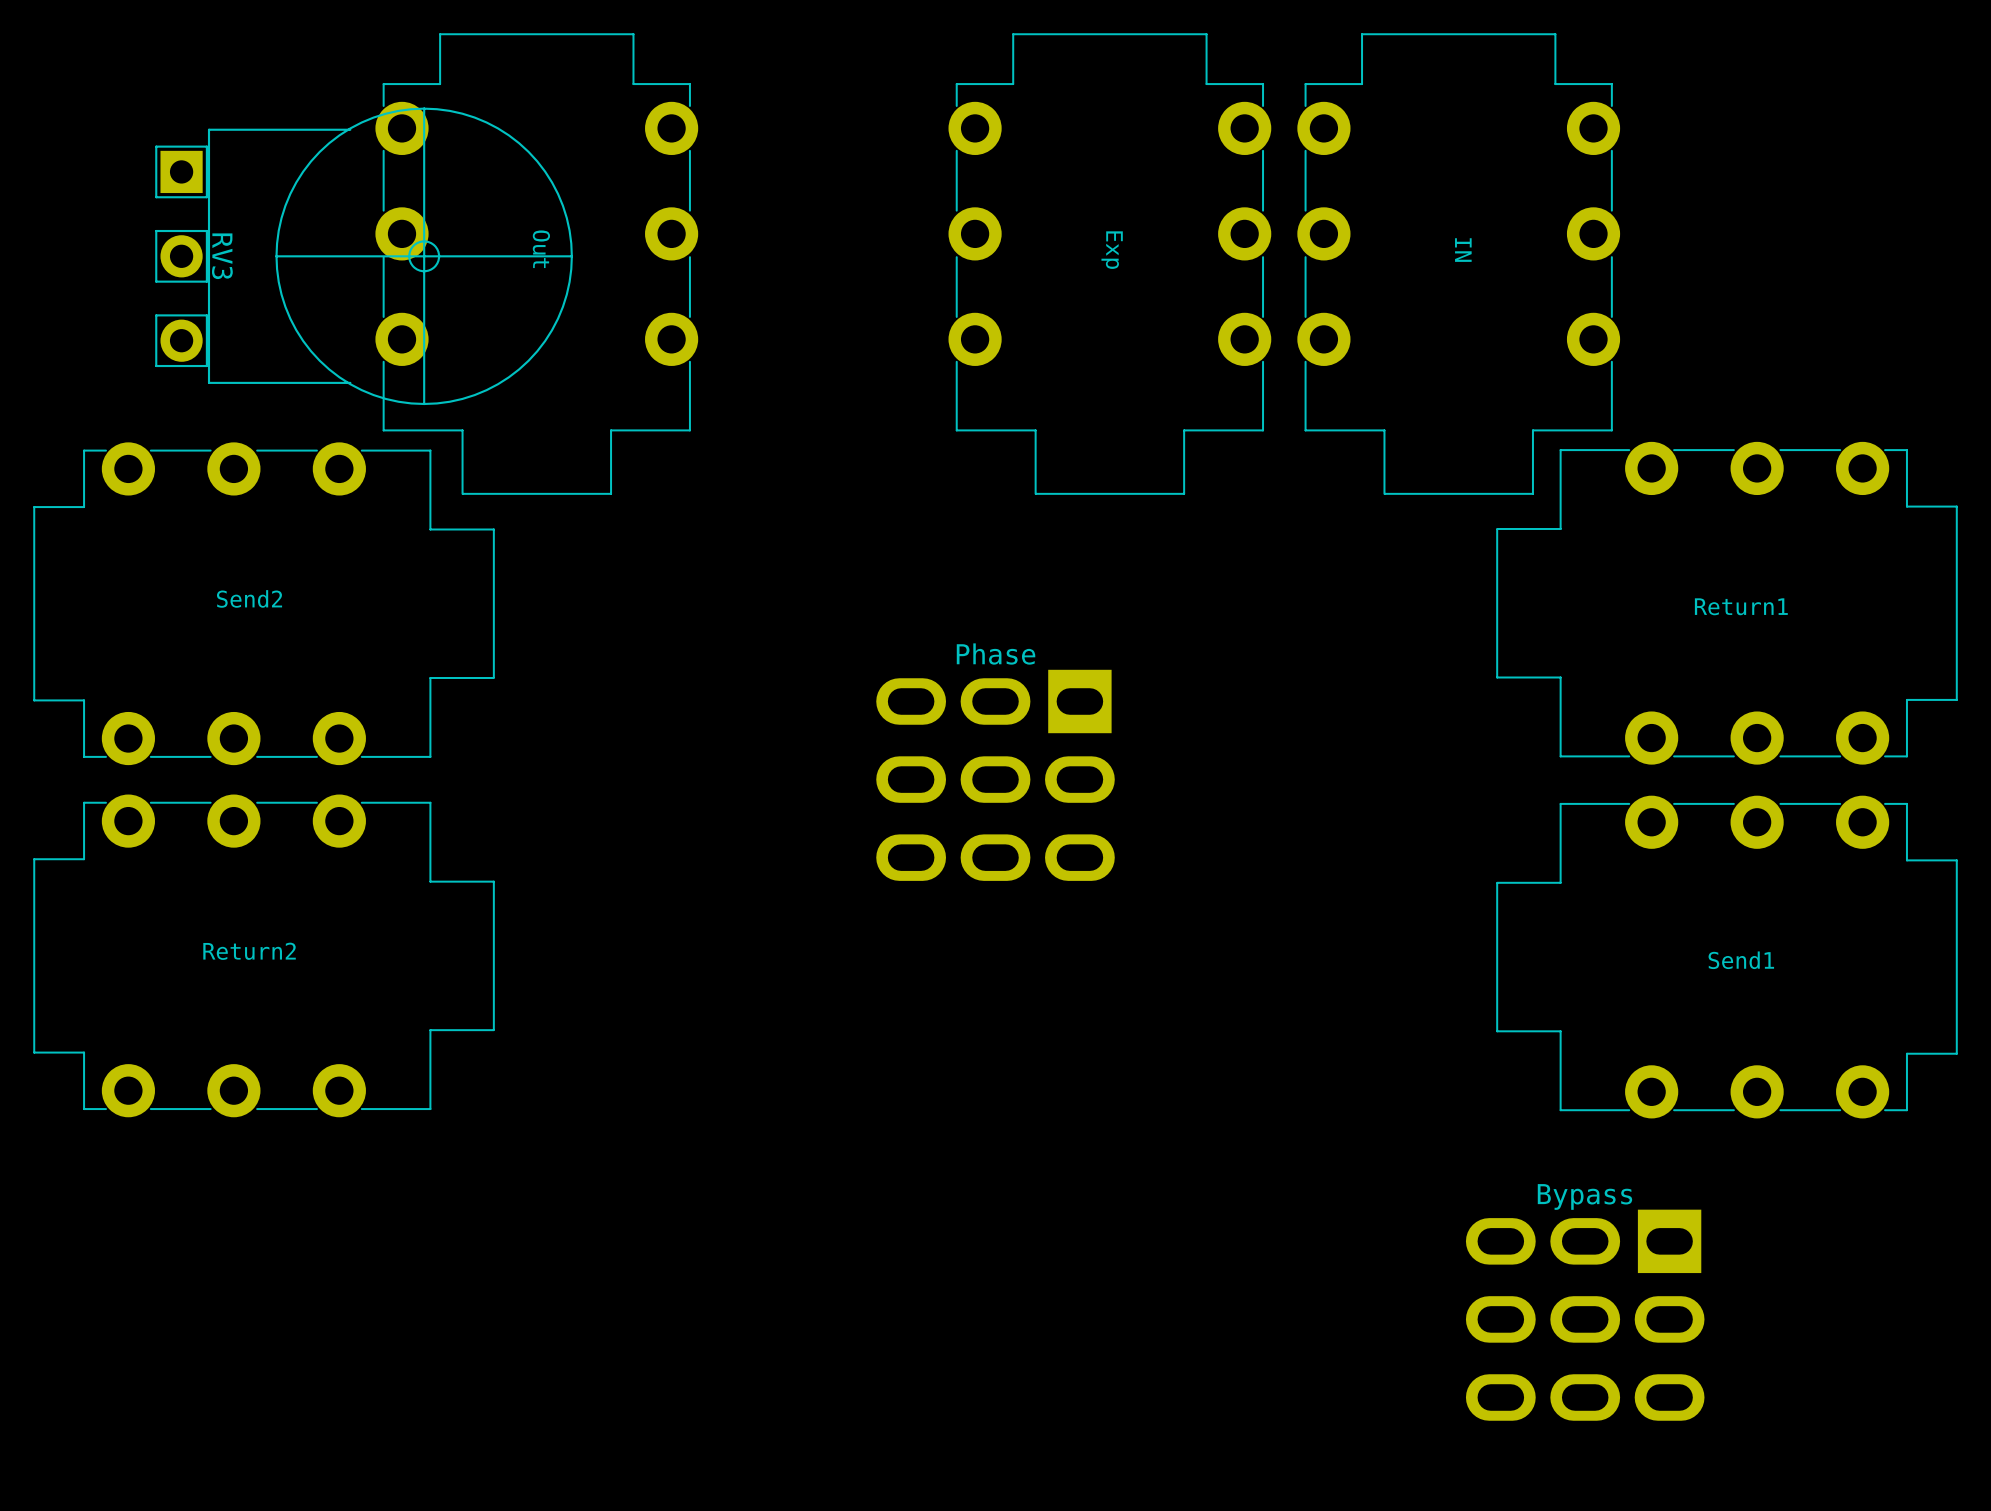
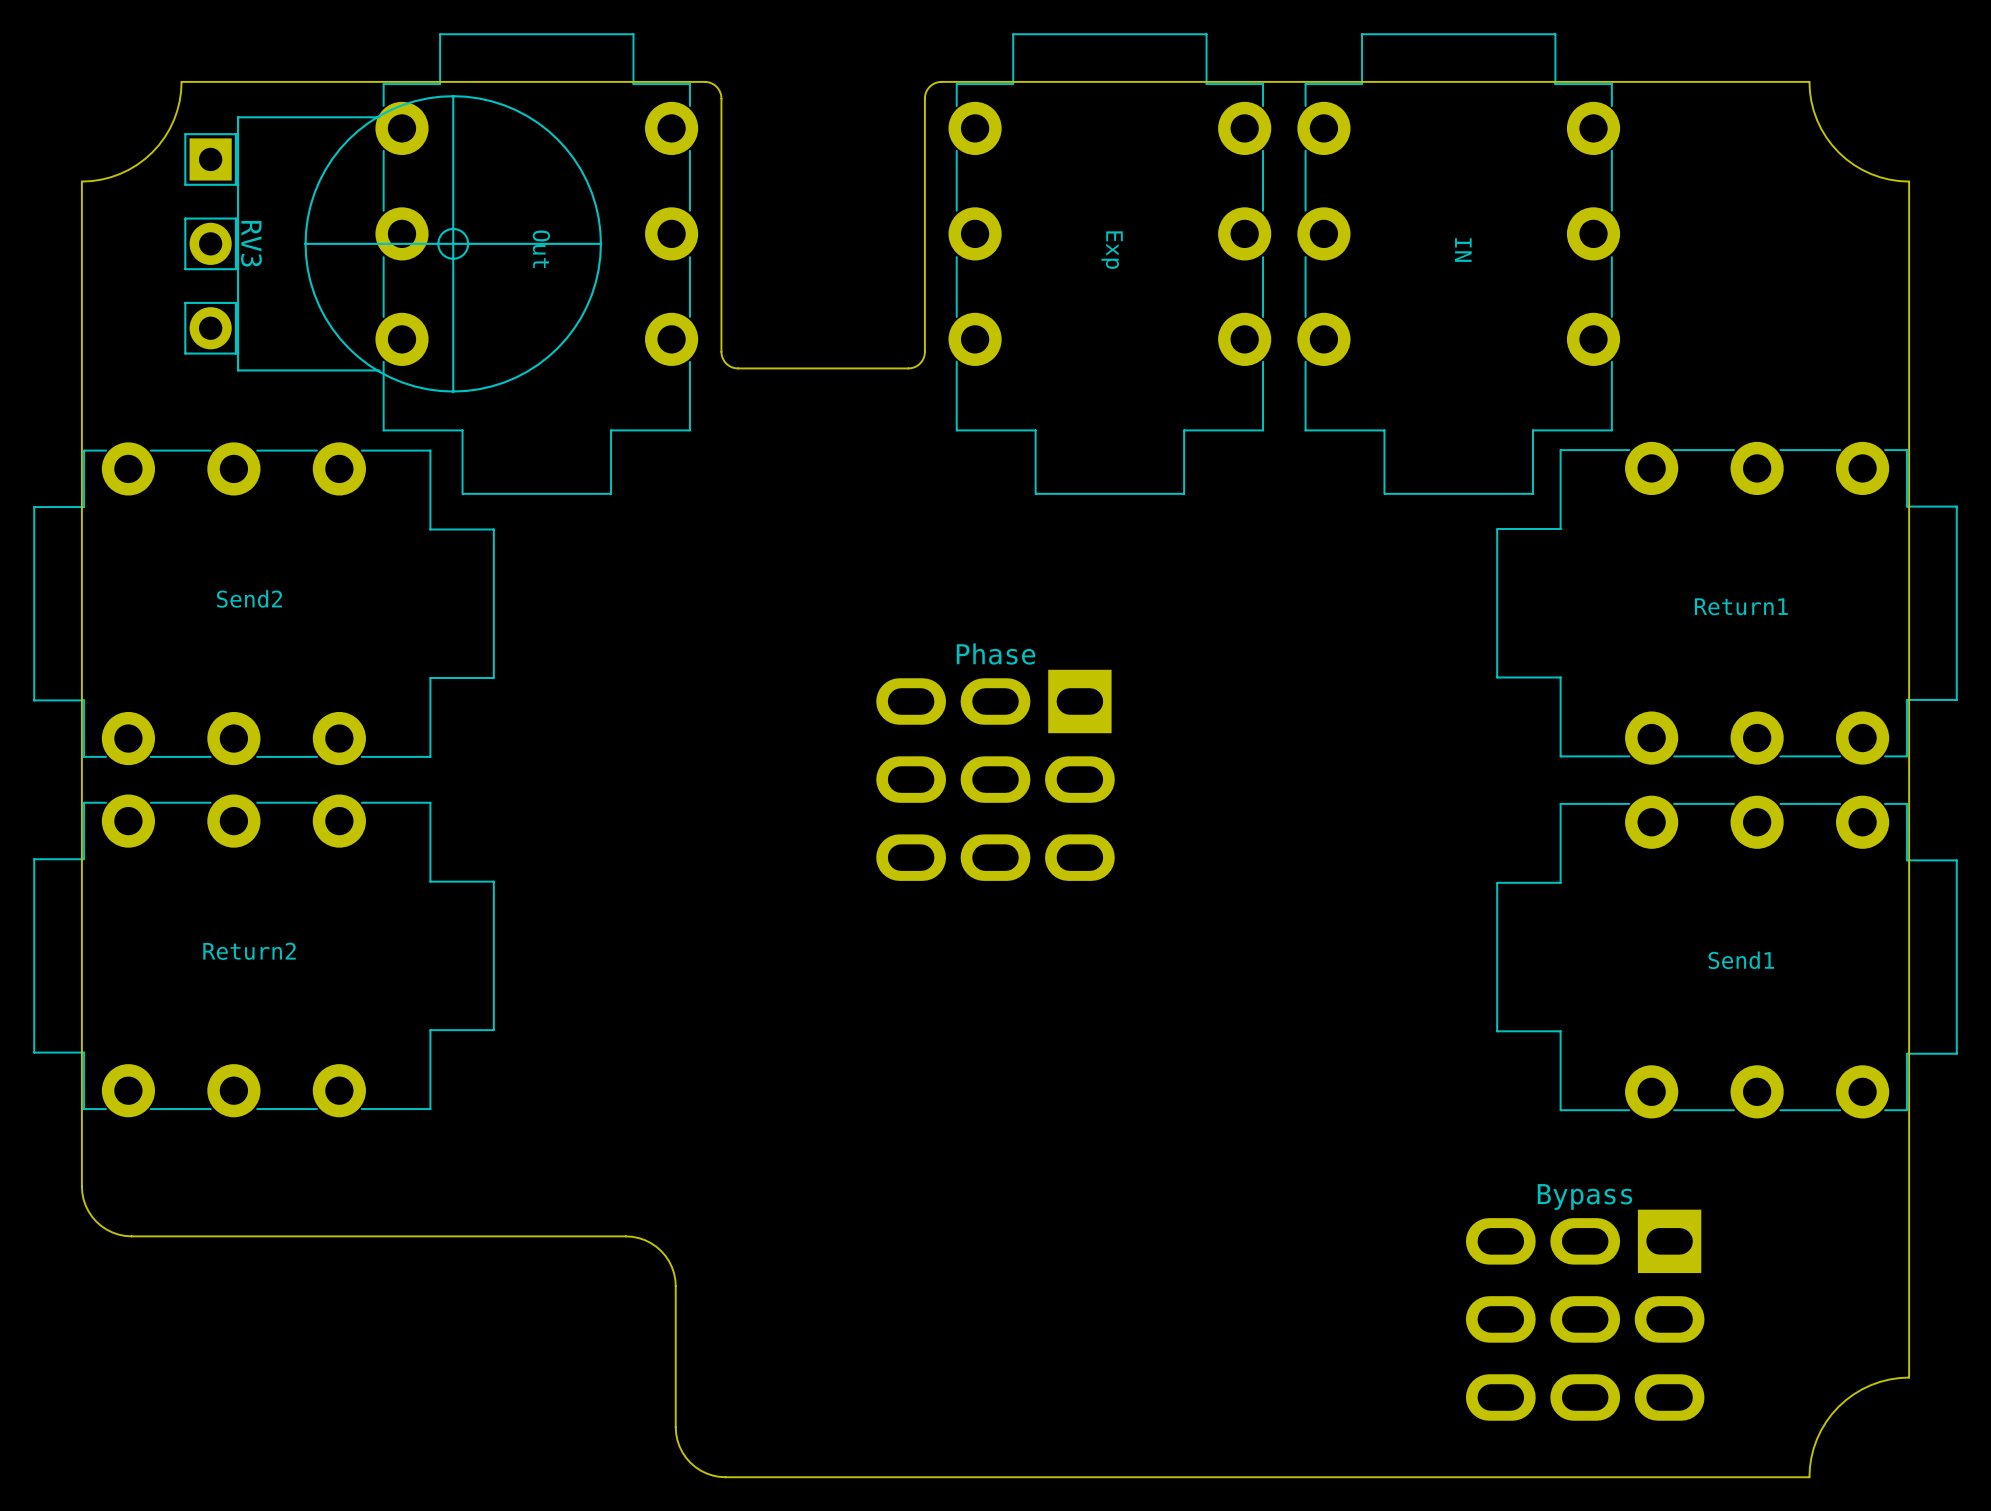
board edge: none -> (1809, 81) (937, 82) (928, 88) (924, 98) (924, 354) (920, 363) (908, 368) (738, 368) (731, 367) (724, 361) (721, 351) (721, 98) (718, 88) (711, 83) (181, 81) (179, 101) (173, 120) (164, 137) (152, 152) (137, 164) (120, 173) (101, 179) (81, 181) (81, 1186) (83, 1199) (88, 1211) (96, 1221) (106, 1229) (118, 1234) (131, 1236) (625, 1236) (644, 1240) (656, 1246) (665, 1255) (671, 1267) (675, 1279) (675, 1427) (677, 1440) (682, 1452) (695, 1466) (706, 1473) (719, 1476) (1809, 1477) (1811, 1457) (1817, 1439) (1826, 1421) (1838, 1406) (1853, 1394) (1870, 1385) (1889, 1379) (1909, 1377) (1909, 181) (1889, 179) (1870, 173) (1853, 164) (1838, 152) (1826, 137) (1817, 120) (1811, 101) (1809, 81)
RV3 position: (364, 256) -> (393, 243)

